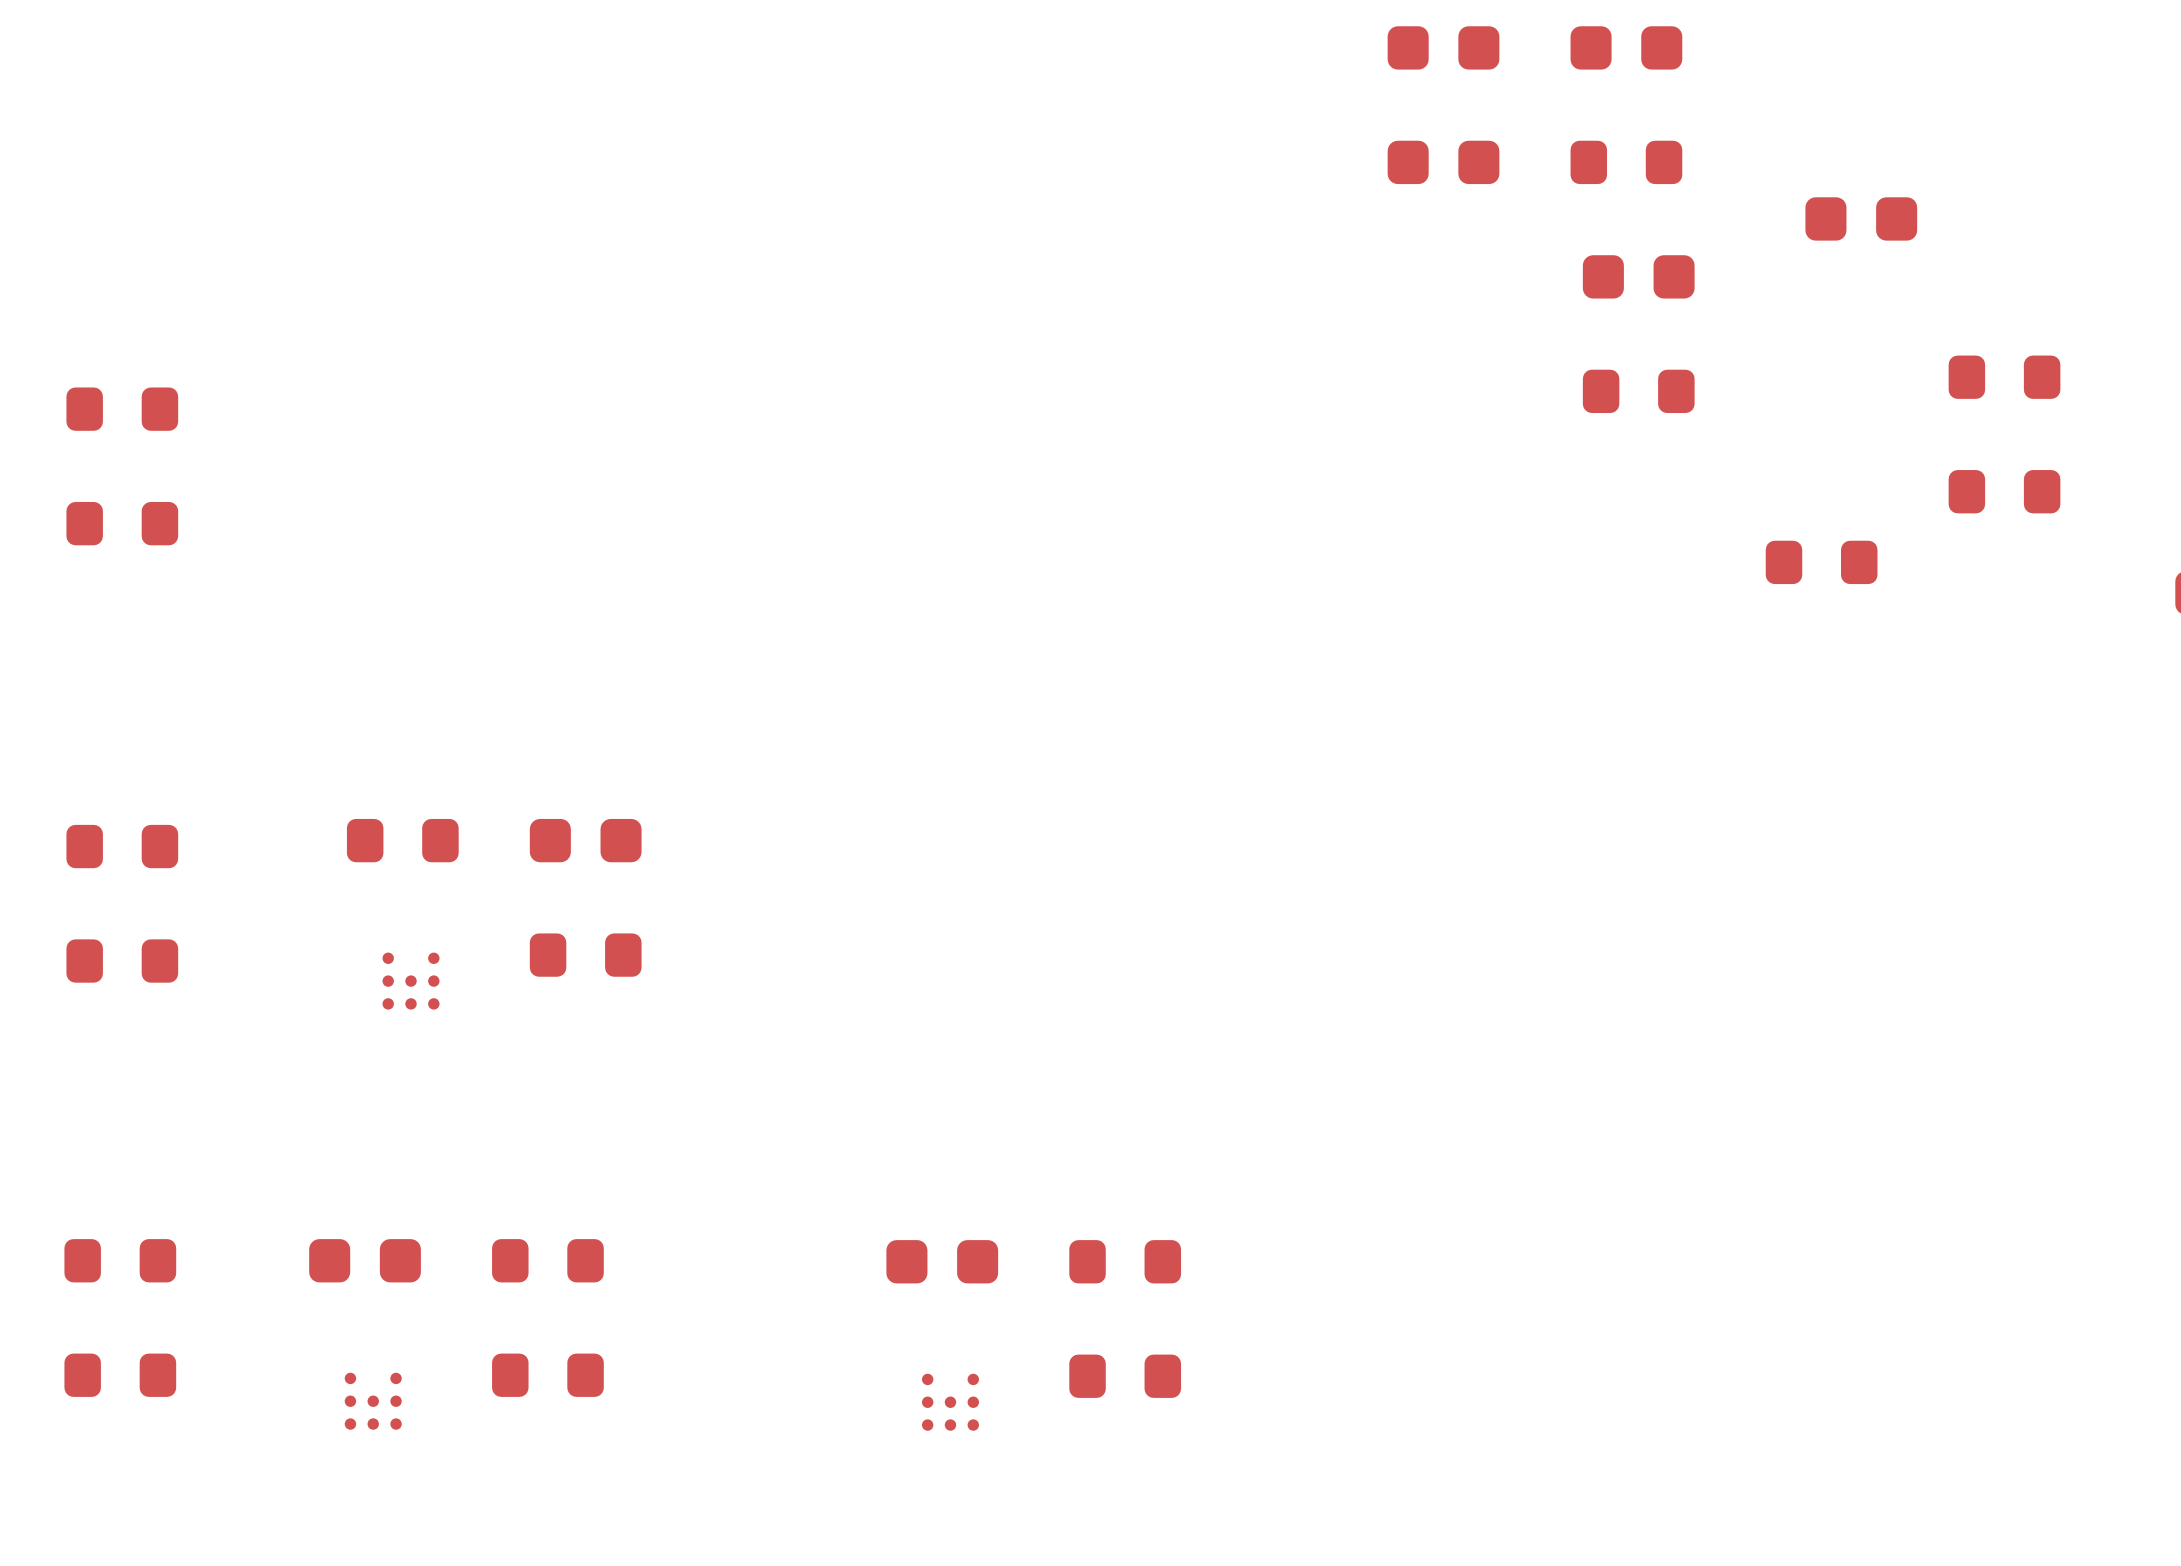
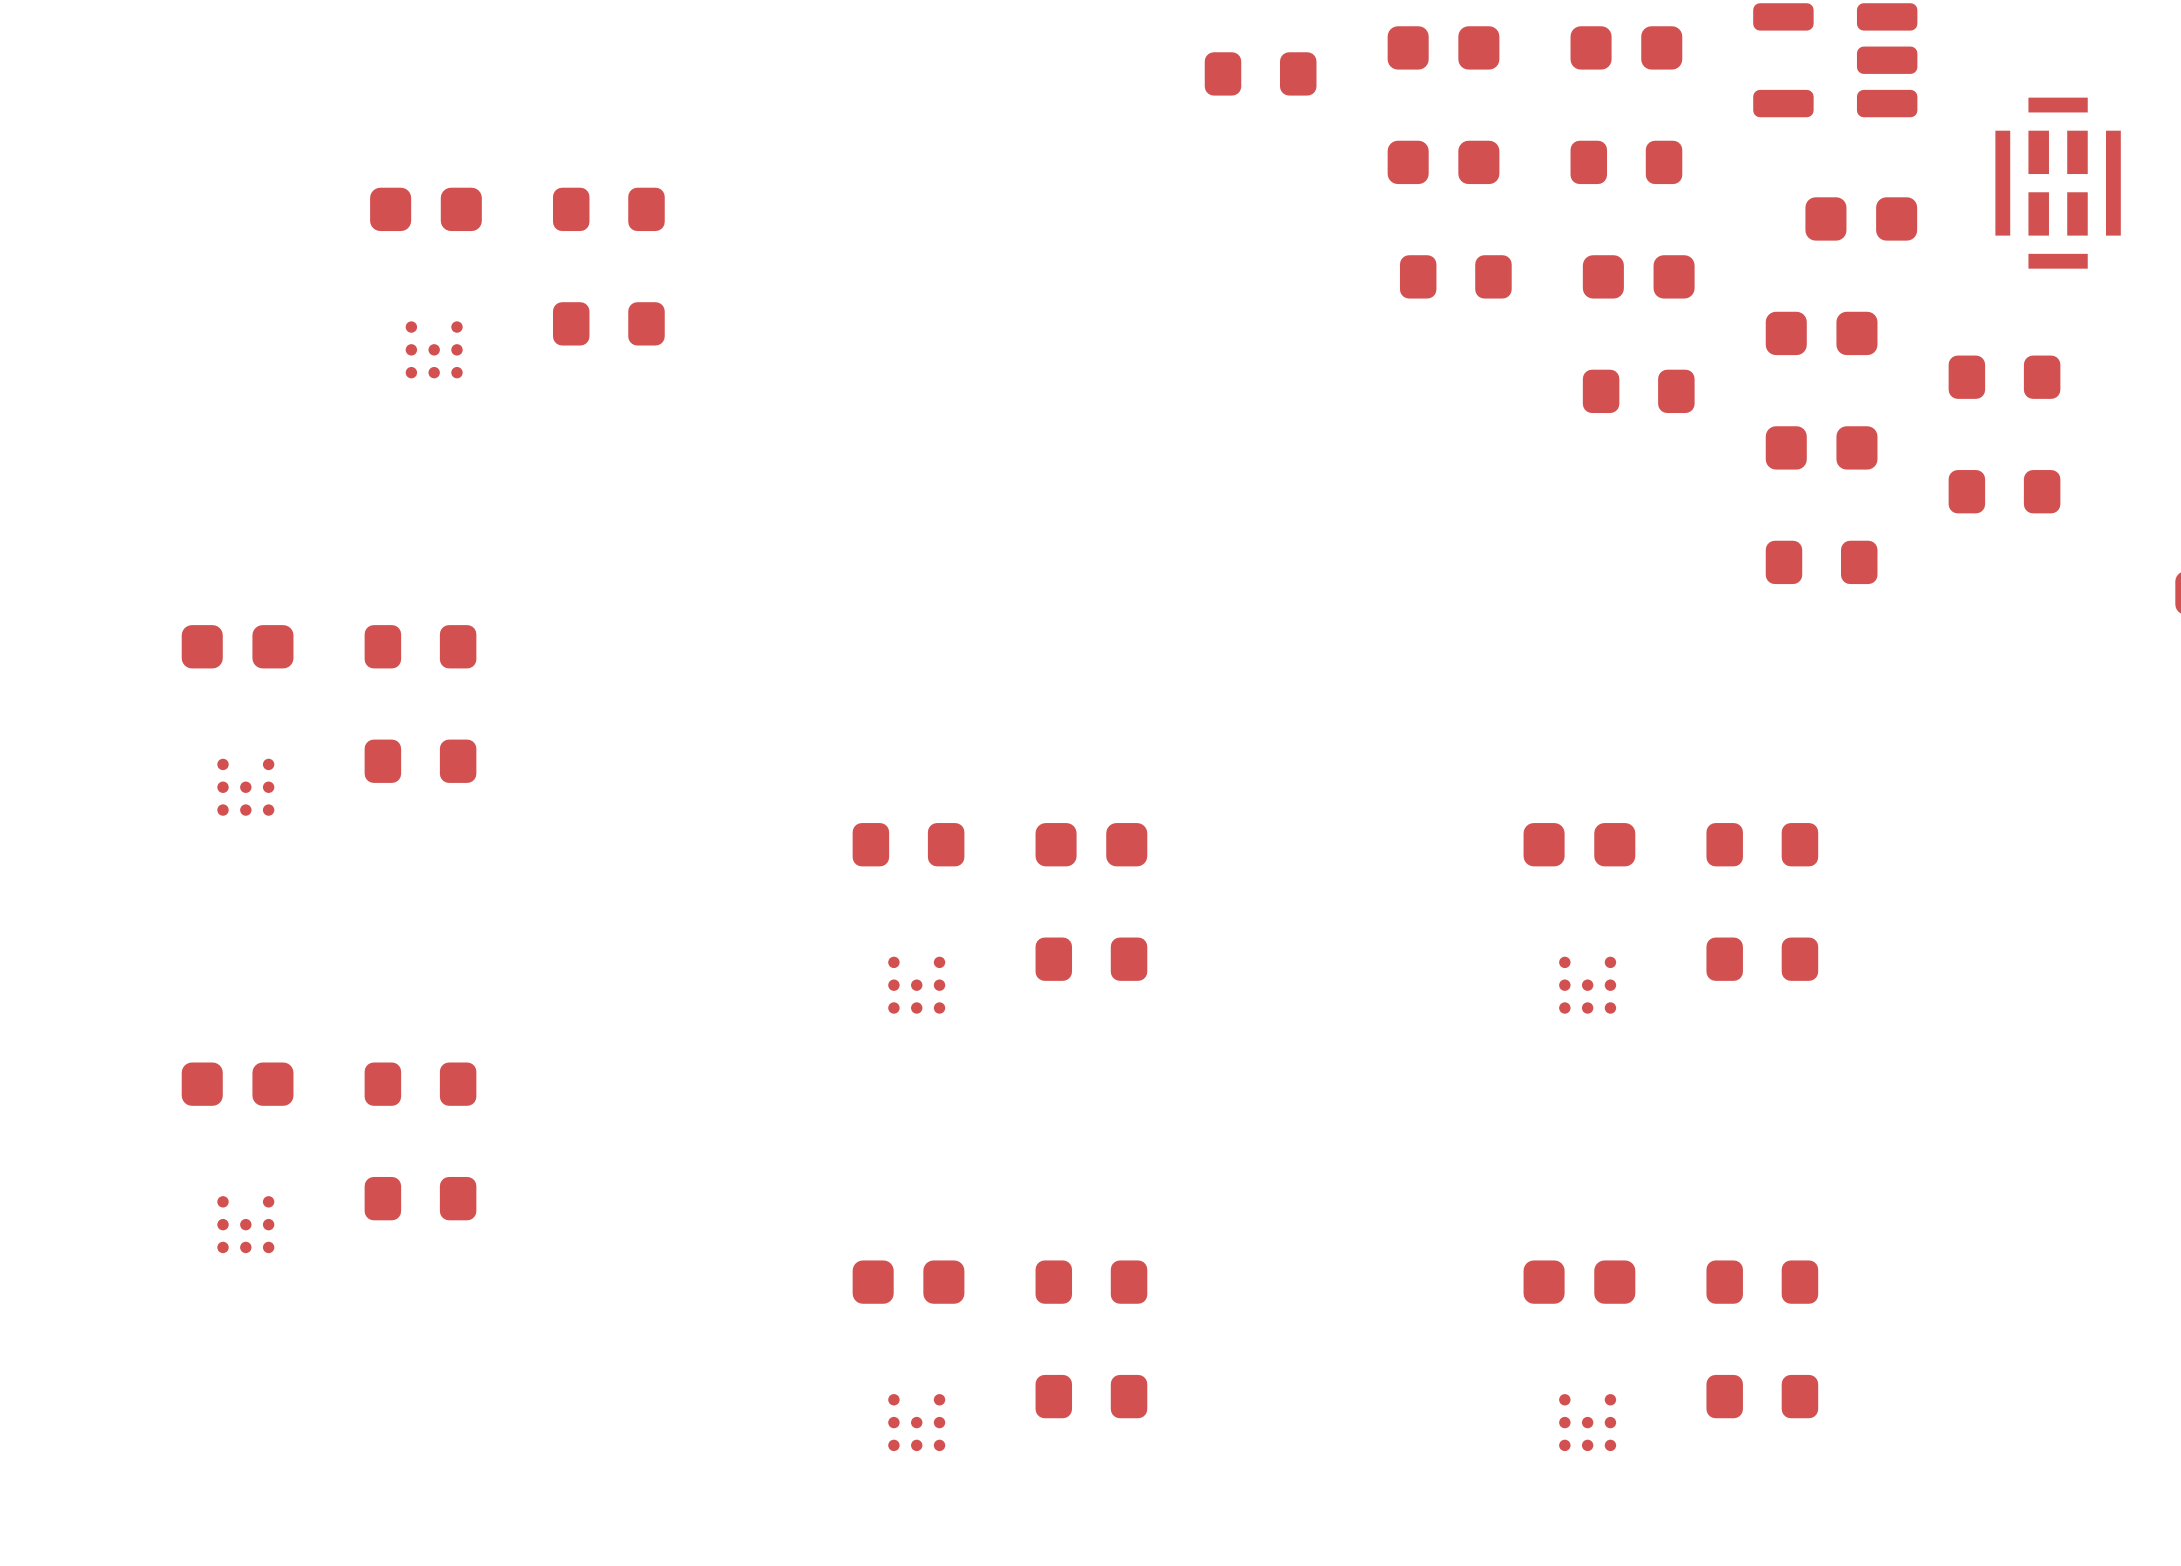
part: none -> (1835, 60)
part: none -> (1260, 73)
part: none -> (2058, 183)
part: none -> (425, 209)
part: none -> (608, 209)
part: none -> (1455, 276)
part: none -> (608, 323)
part: none -> (1821, 333)
part: none -> (434, 349)
part: (122, 409) -> none
part: none -> (1821, 447)
part: (122, 523) -> none
part: none -> (237, 646)
part: none -> (420, 646)
part: none -> (245, 787)
part position: (402, 840) -> (420, 761)
part: (585, 840) -> none
part: none -> (908, 844)
part: none -> (1091, 844)
part: none -> (1579, 844)
part: none -> (1762, 844)
part: (122, 846) -> none
part: (585, 955) -> none
part: none -> (1091, 959)
part: none -> (1762, 959)
part: (122, 961) -> none
part: (411, 981) -> none
part: none -> (916, 985)
part: none -> (1587, 985)
part: none -> (237, 1084)
part: none -> (420, 1084)
part: none -> (420, 1198)
part: none -> (245, 1224)
part: (120, 1260) -> none
part: (365, 1260) -> none
part: (547, 1260) -> none
part position: (942, 1261) -> (908, 1282)
part position: (1125, 1261) -> (1091, 1282)
part: none -> (1579, 1282)
part: none -> (1762, 1282)
part: (120, 1375) -> none
part: (547, 1375) -> none
part position: (1125, 1376) -> (1091, 1396)
part: none -> (1762, 1396)
part: (373, 1401) -> none
part position: (950, 1402) -> (916, 1422)
part: none -> (1587, 1422)

